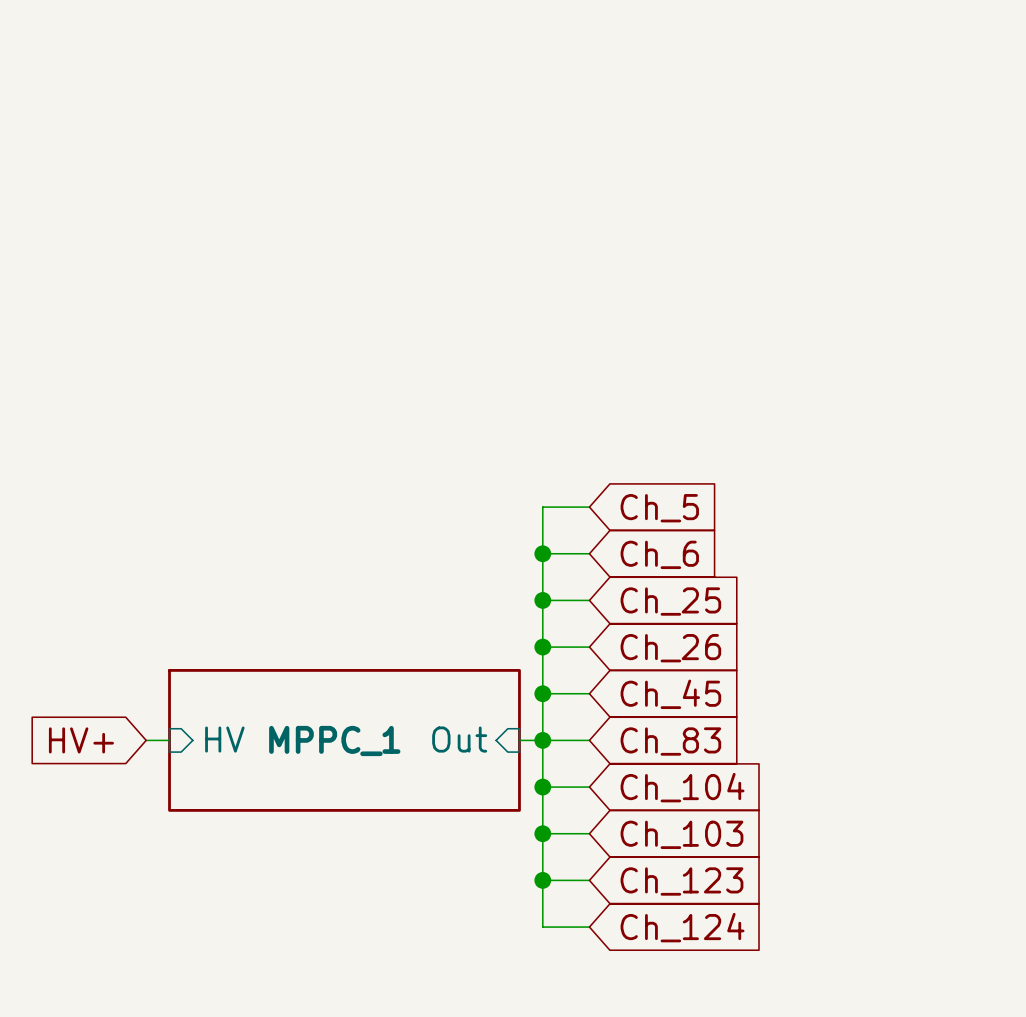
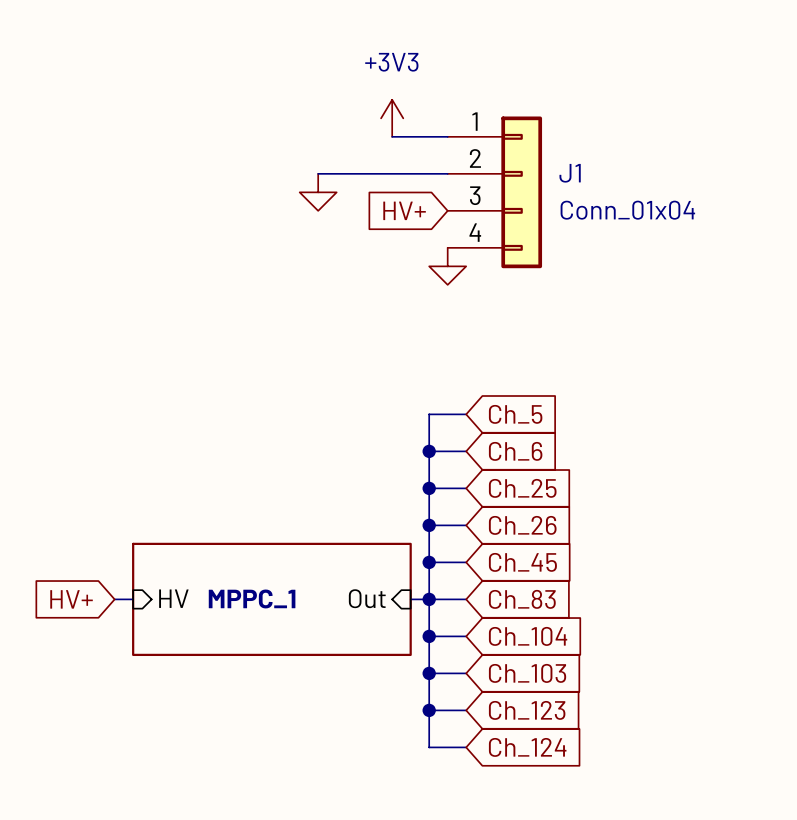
power symbol: none -> +3V3 (392, 118)
wire: none -> (392, 136) (447, 136)
wire: none -> (318, 173) (447, 173)
power symbol: none -> (318, 192)
J1: none -> Conn_01x04 (494, 192)
global label: none -> HV+ (404, 210)
power symbol: none -> (447, 266)

